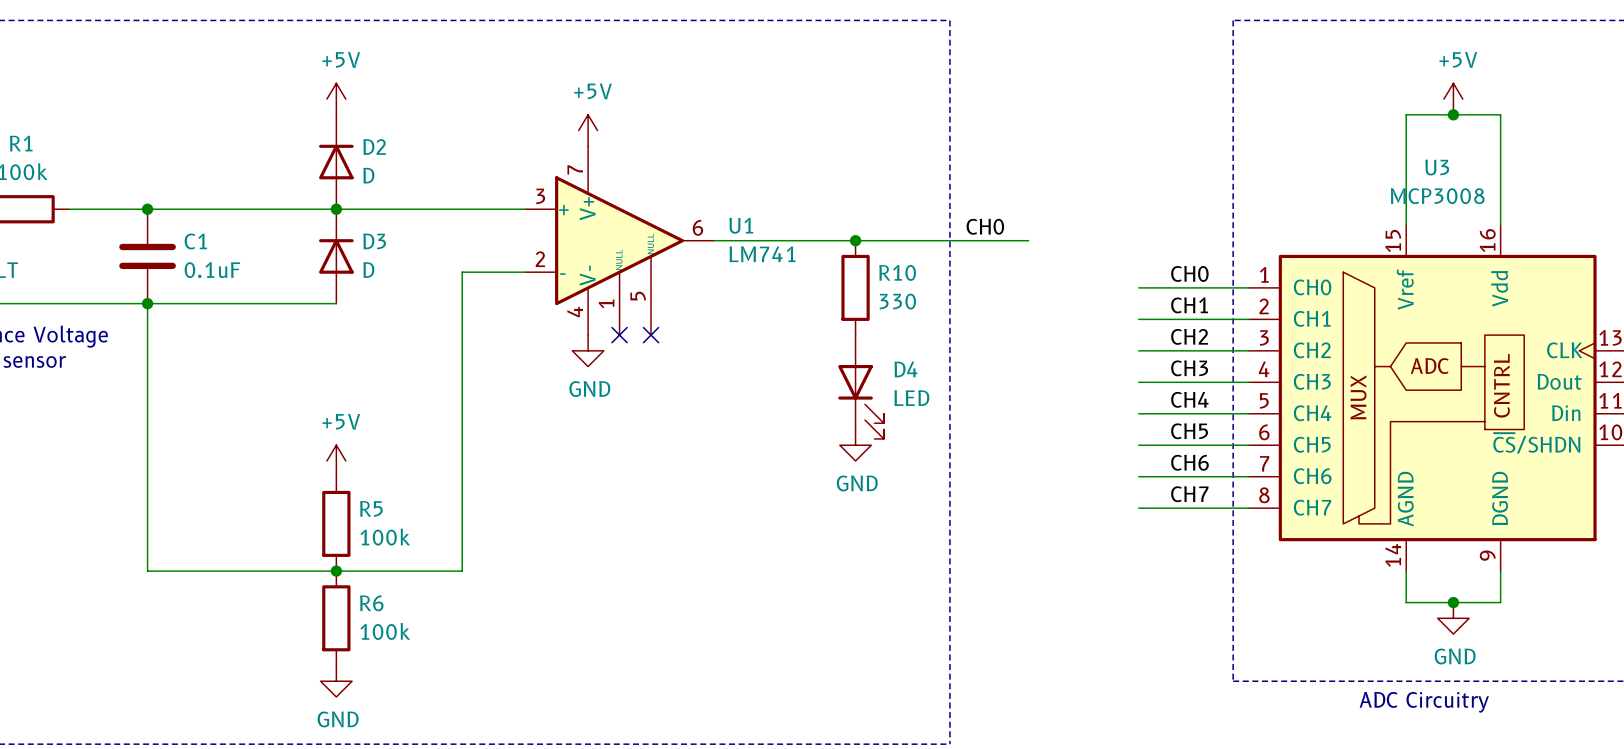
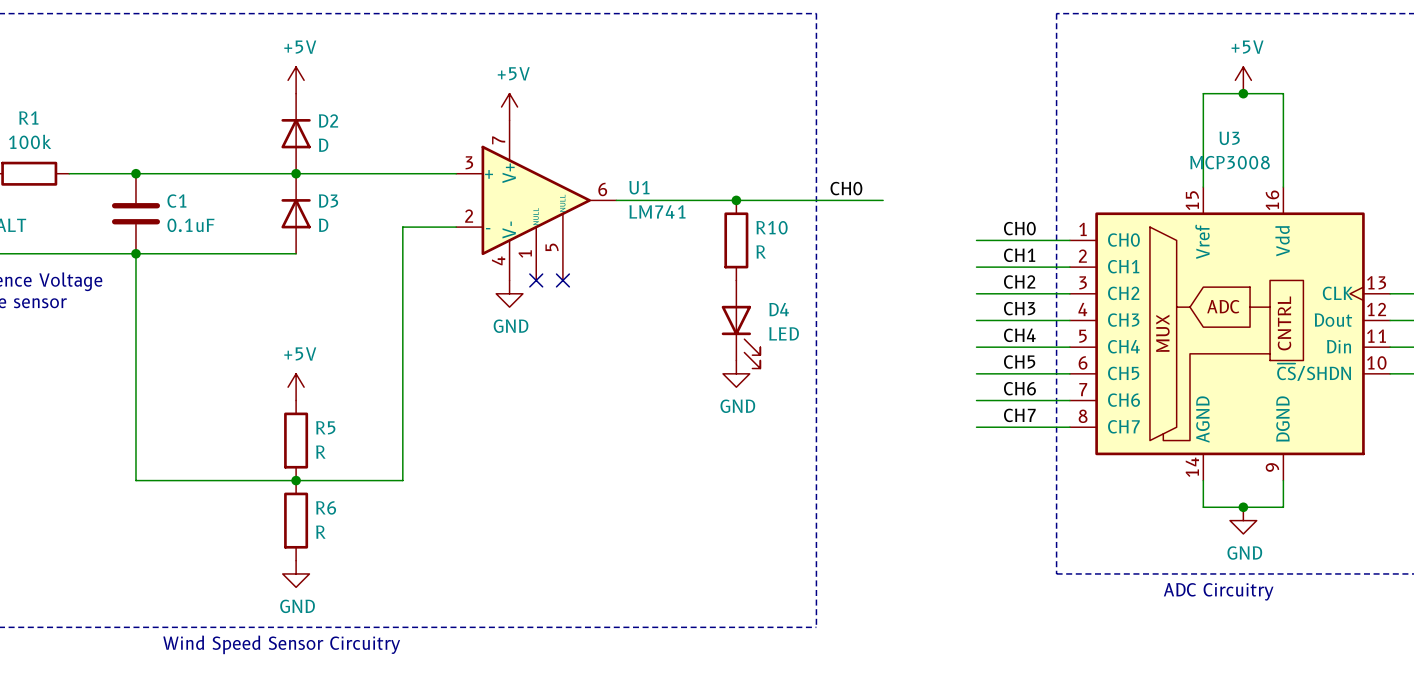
R10 value: 330 (897, 301) -> R (761, 251)
R5 value: 100k (385, 537) -> R (320, 452)
R6 value: 100k (385, 631) -> R (320, 532)

